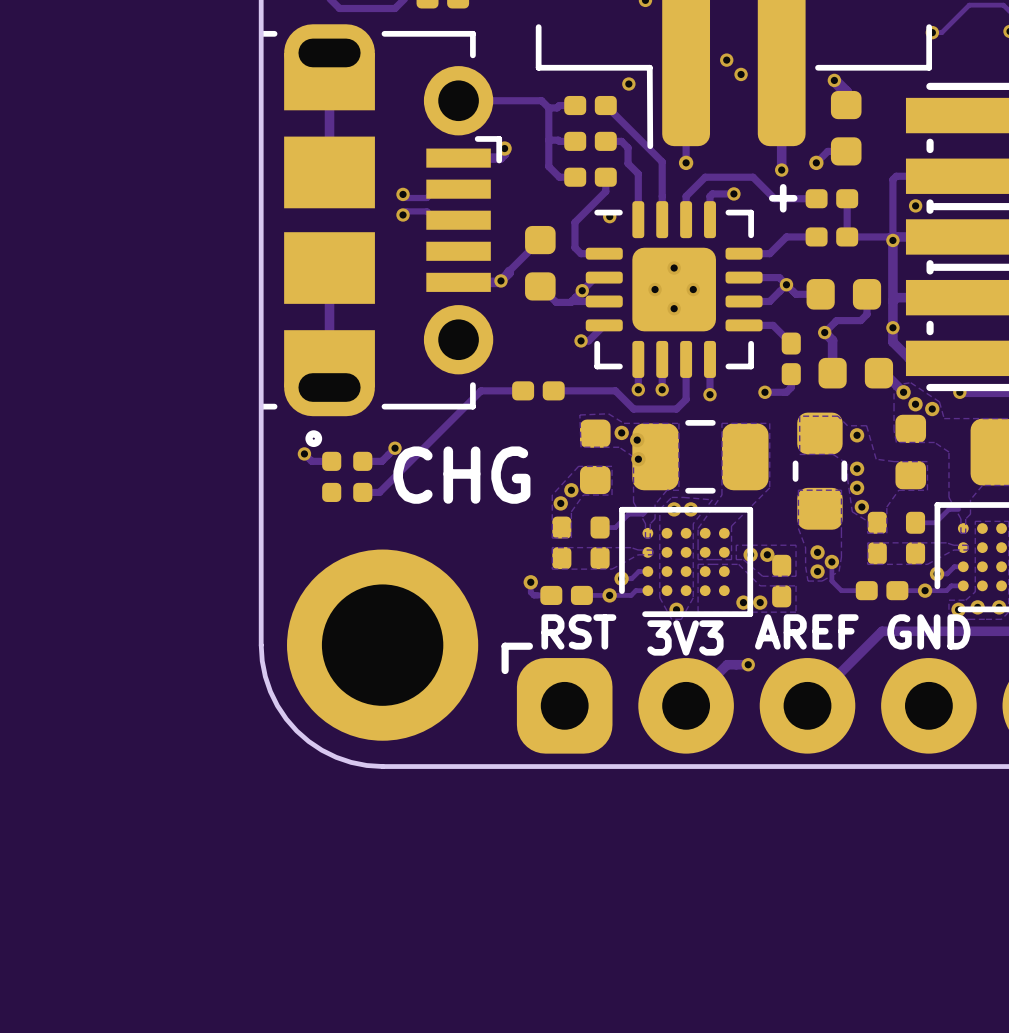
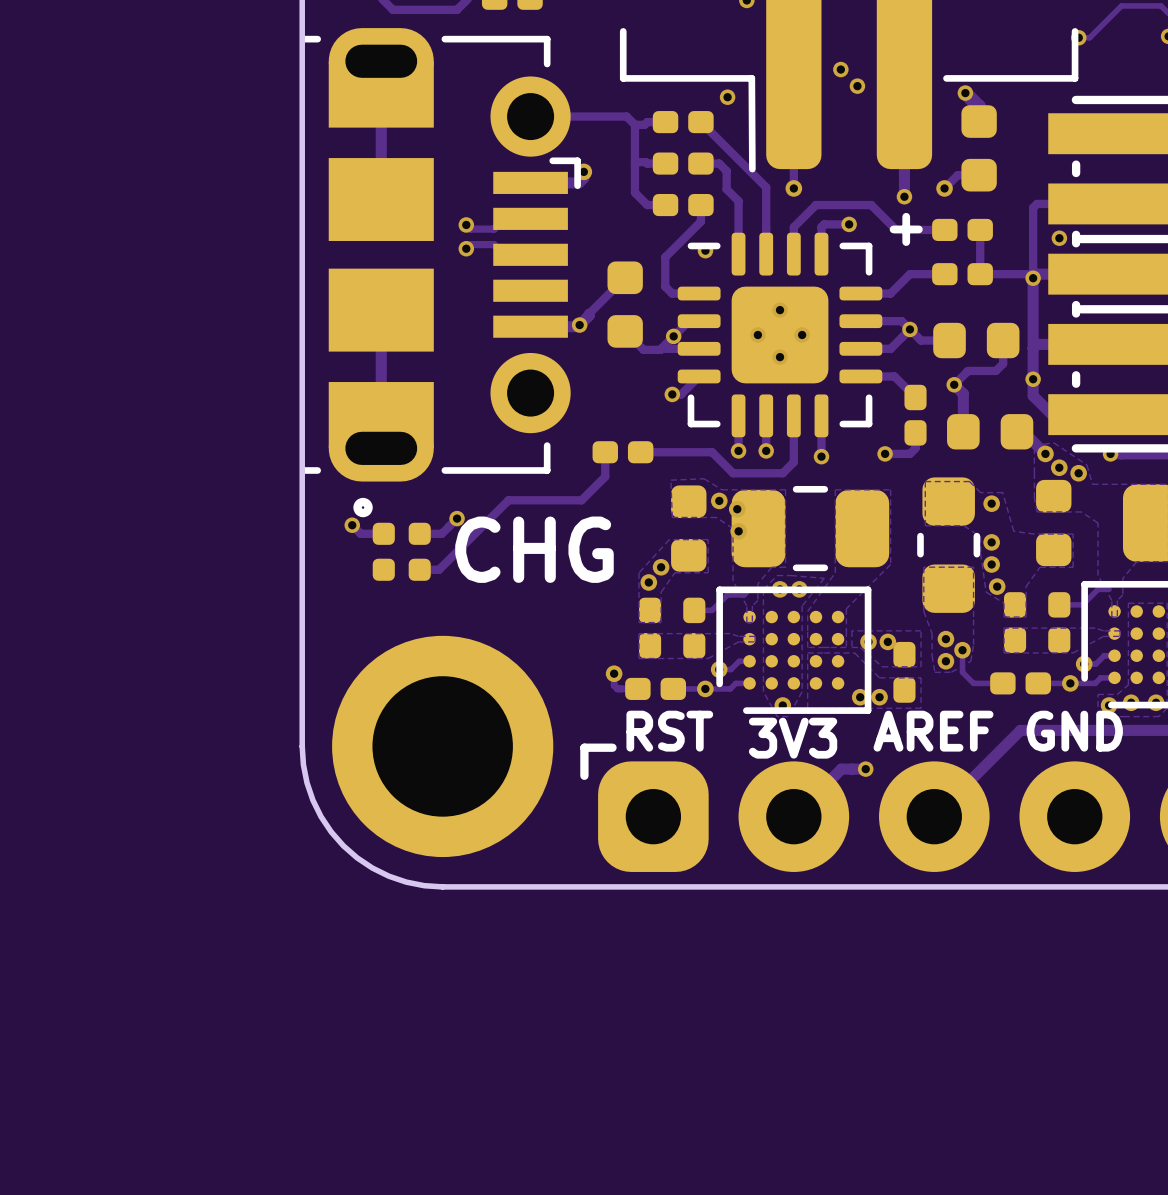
track: (523, 390) (481, 390) (439, 432) -> (605, 452) (605, 476) (581, 500) (508, 500)

